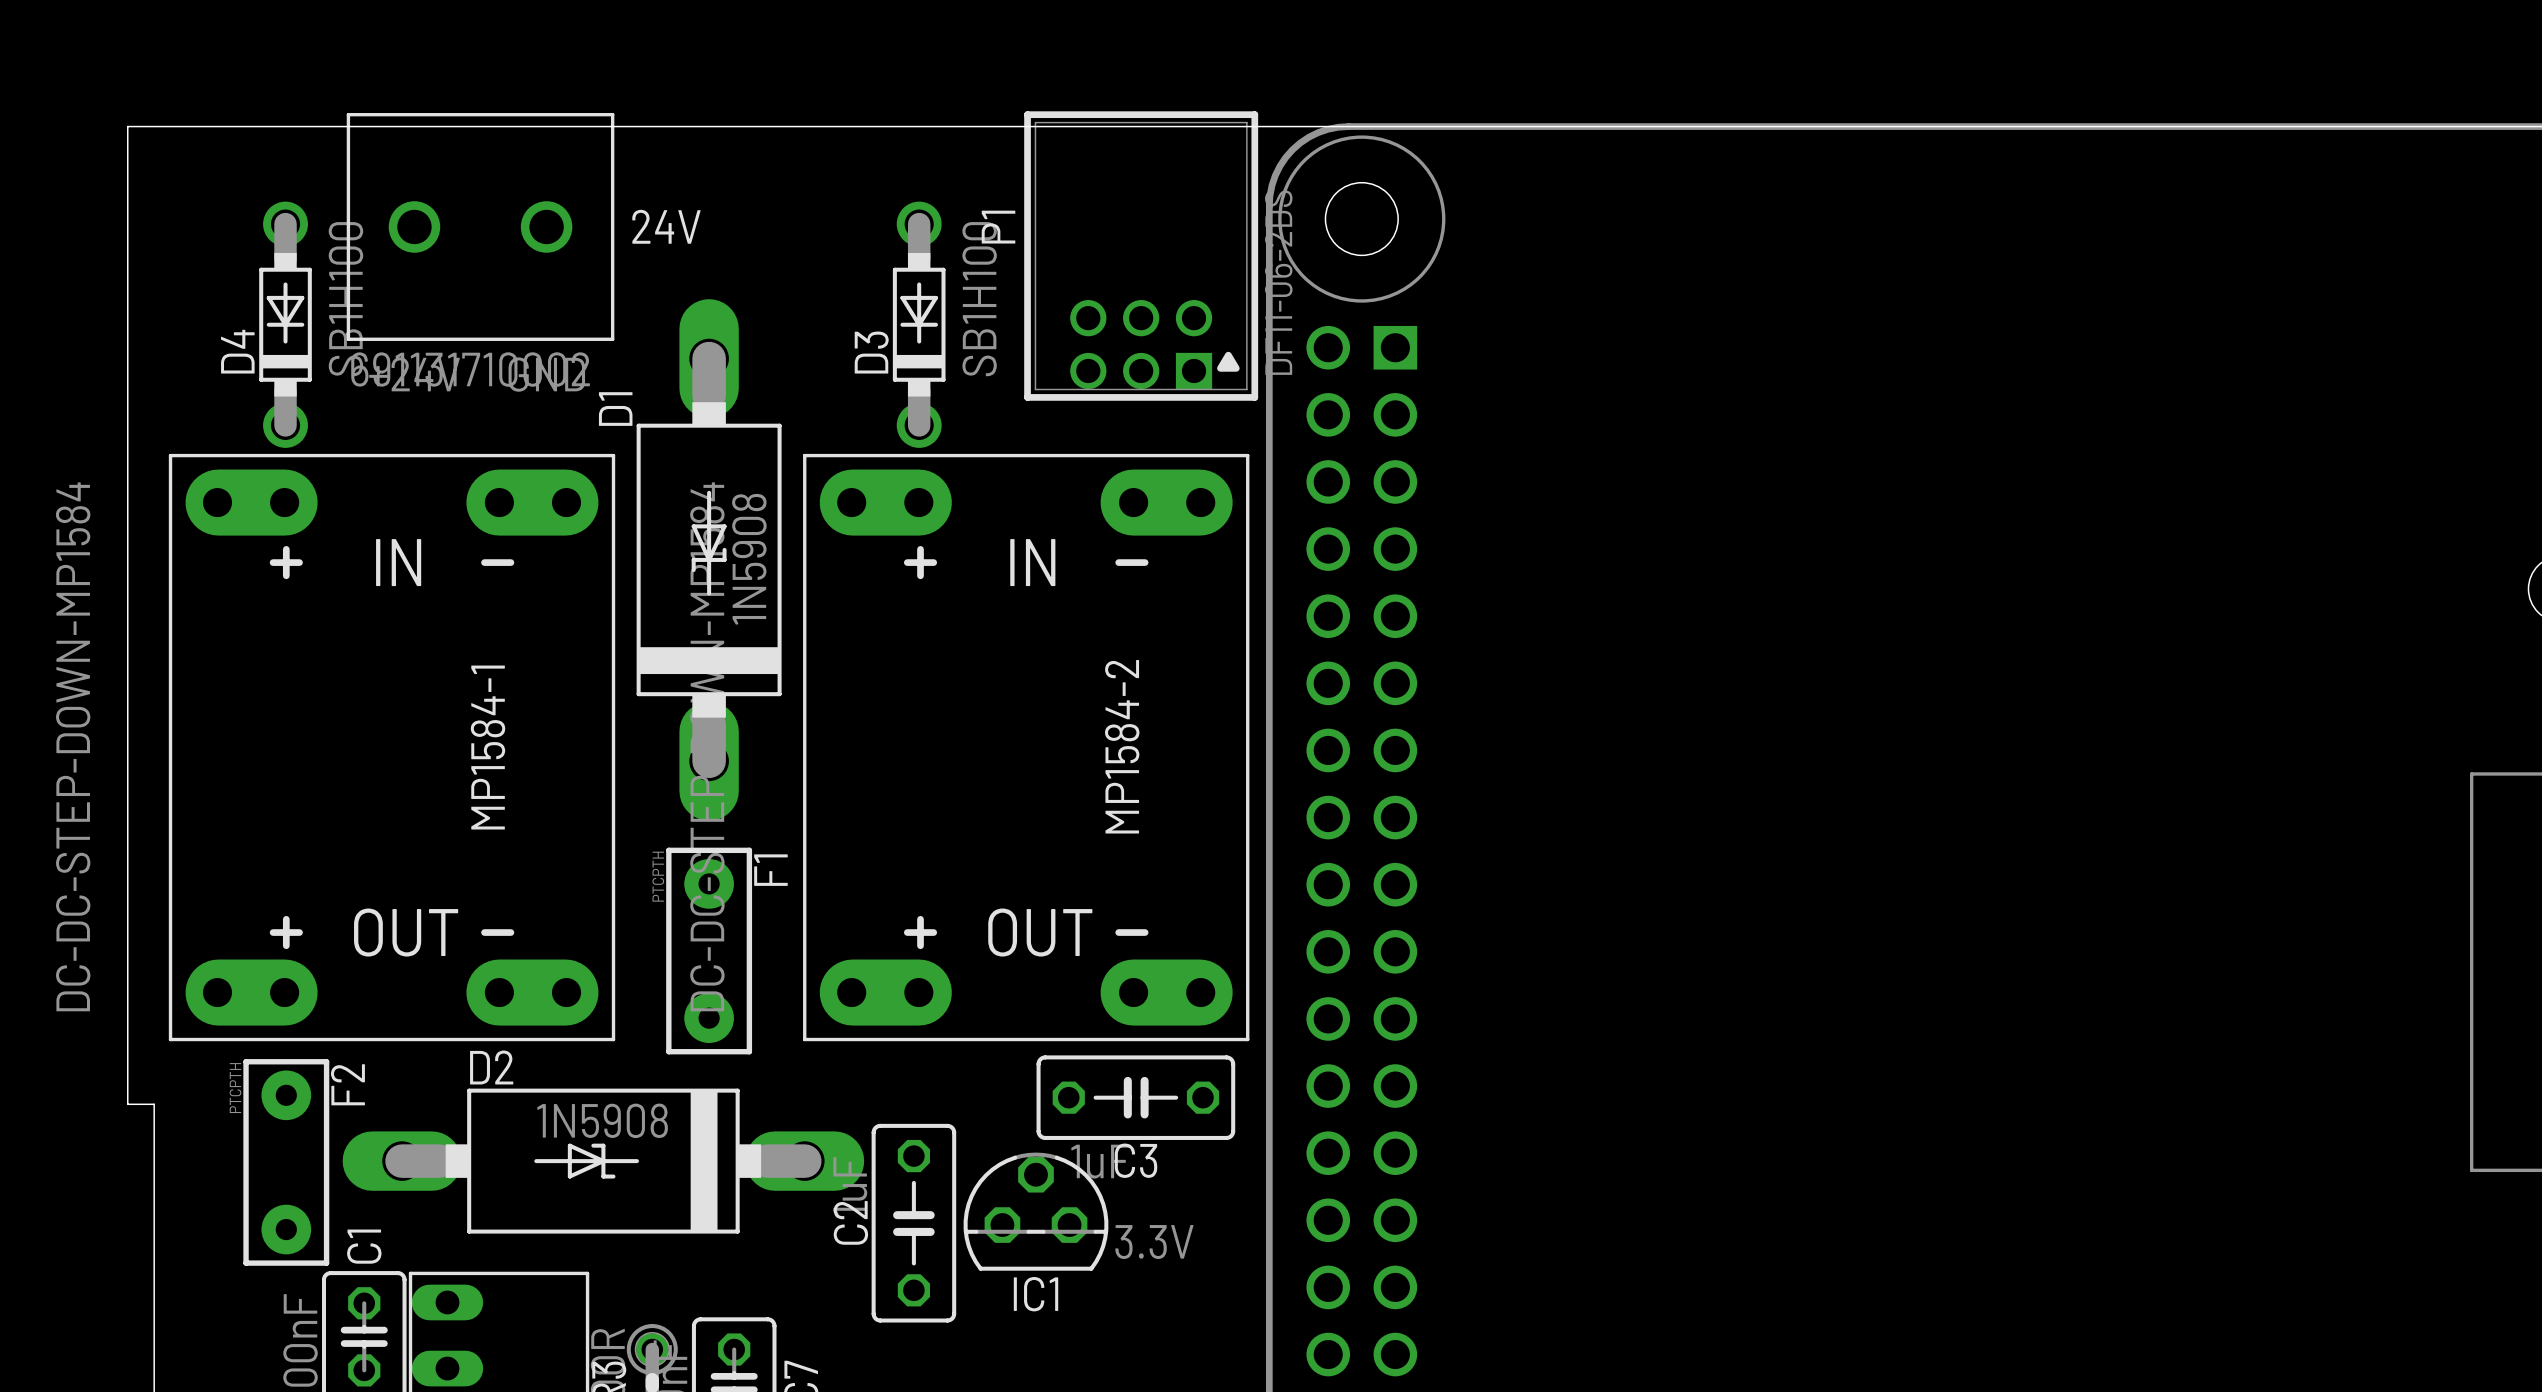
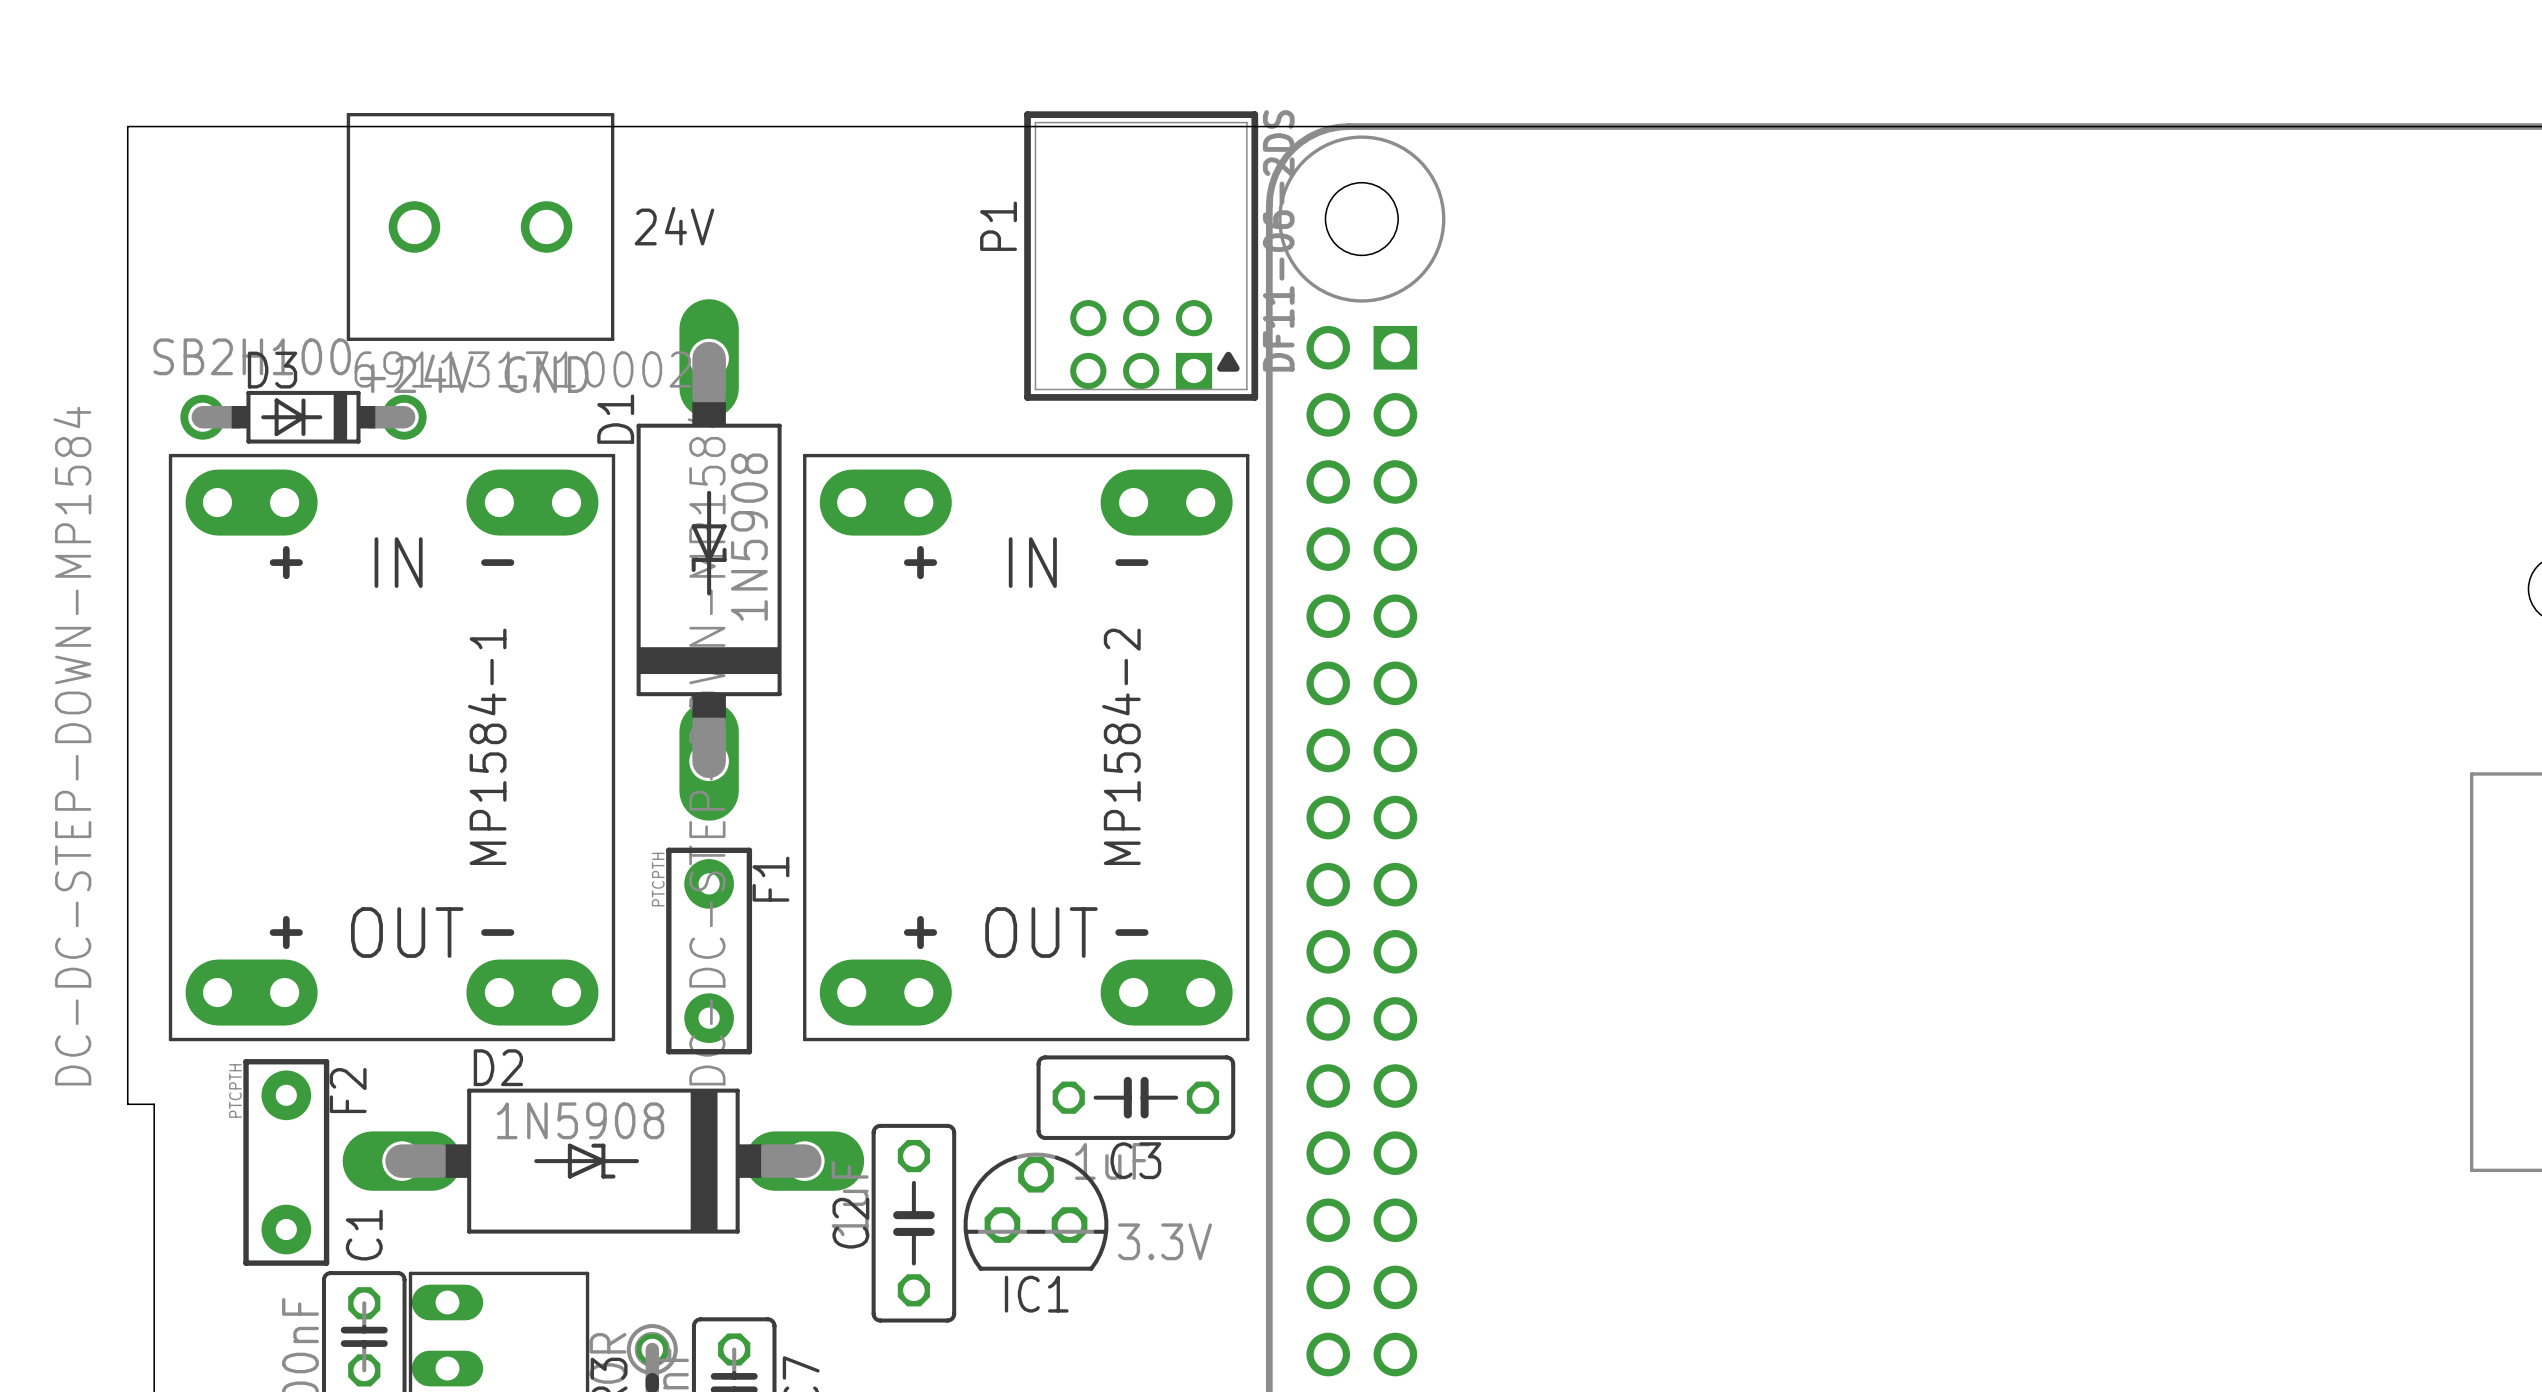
D3 value: SB1H100 (979, 299) -> SB2H100 (252, 356)
D4: SB1H100 (285, 324) -> none
D3 rotation: 0° (919, 324) -> 90° counterclockwise (303, 417)
D3 position: (919, 324) -> (303, 417)
D3 name position: D3 (871, 352) -> D3 (272, 370)

